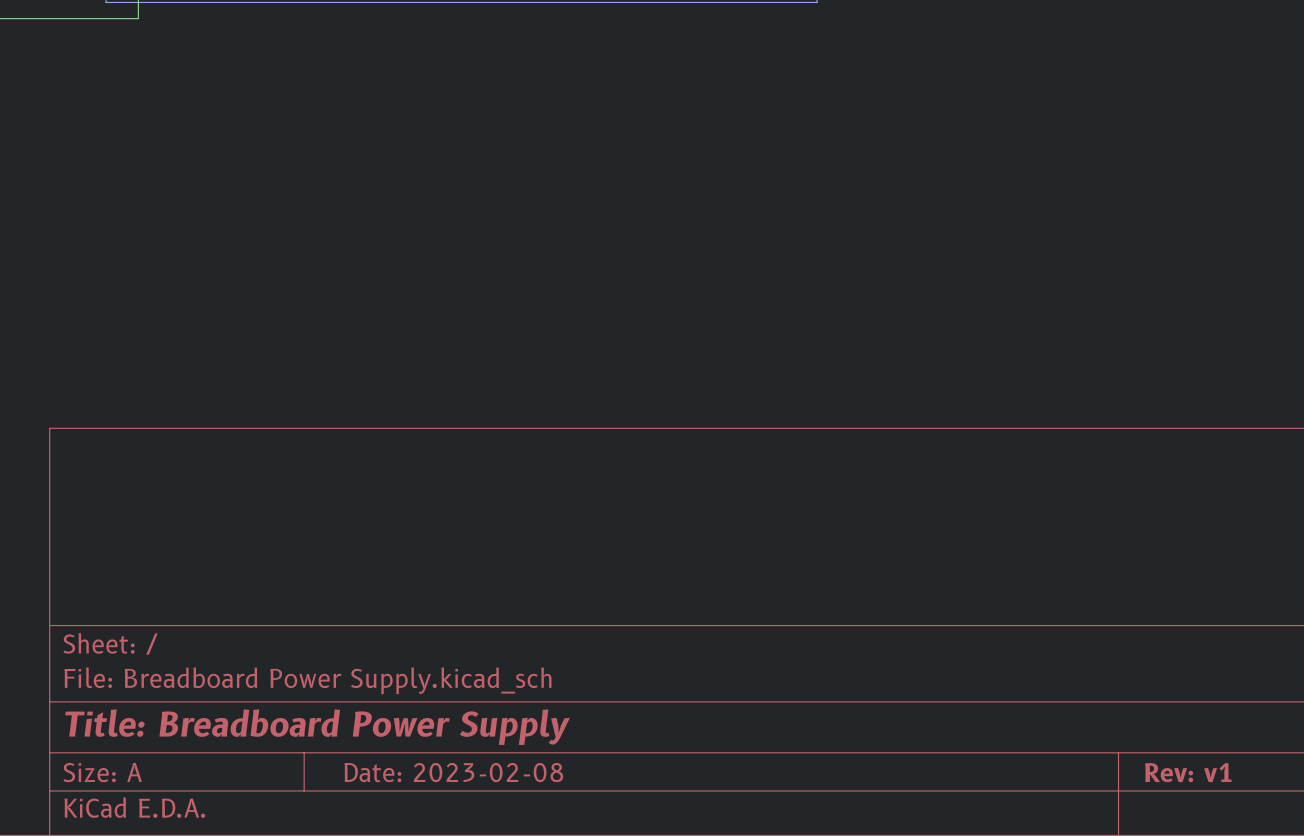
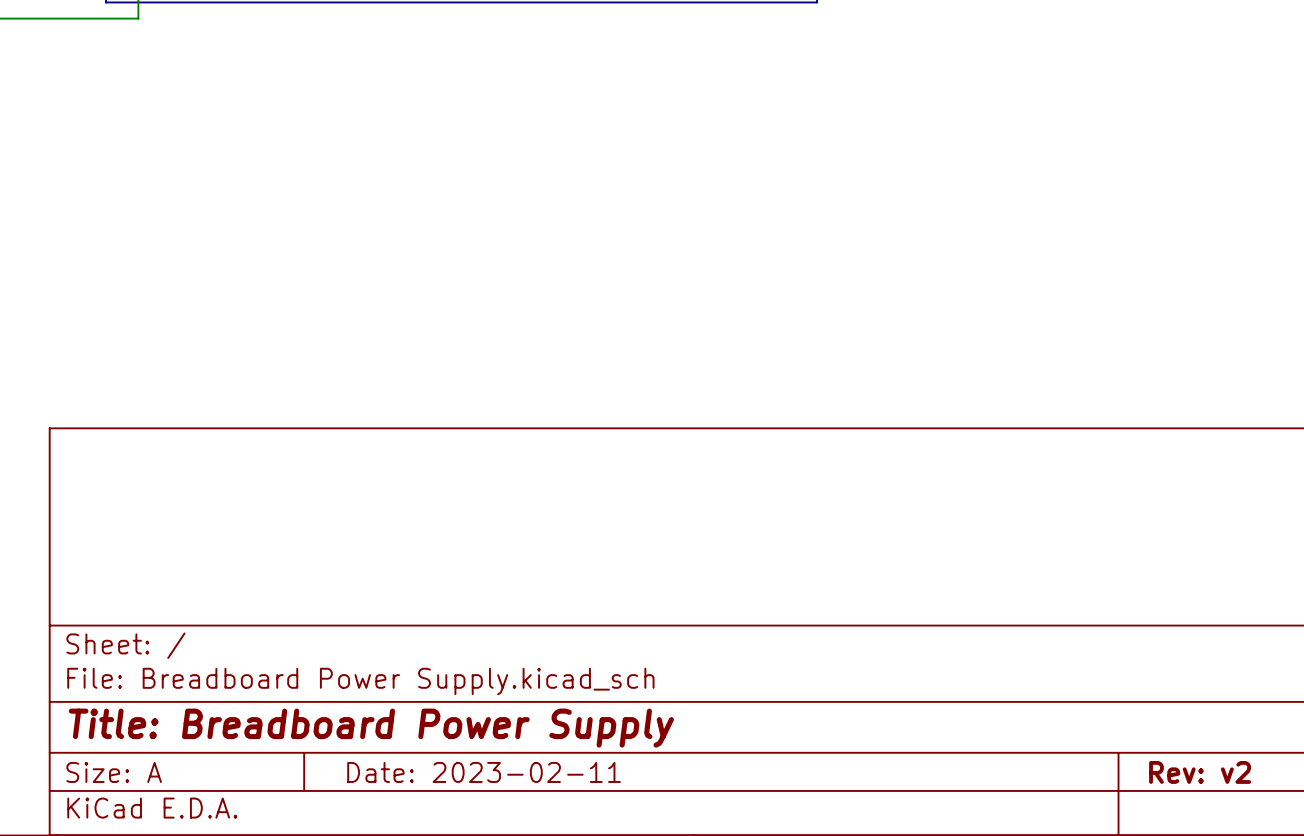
title block: Date: 2023-02-08 (453, 772) -> Date: 2023-02-11 (484, 772)
title block: Rev: v1 (1188, 772) -> Rev: v2 (1200, 772)

